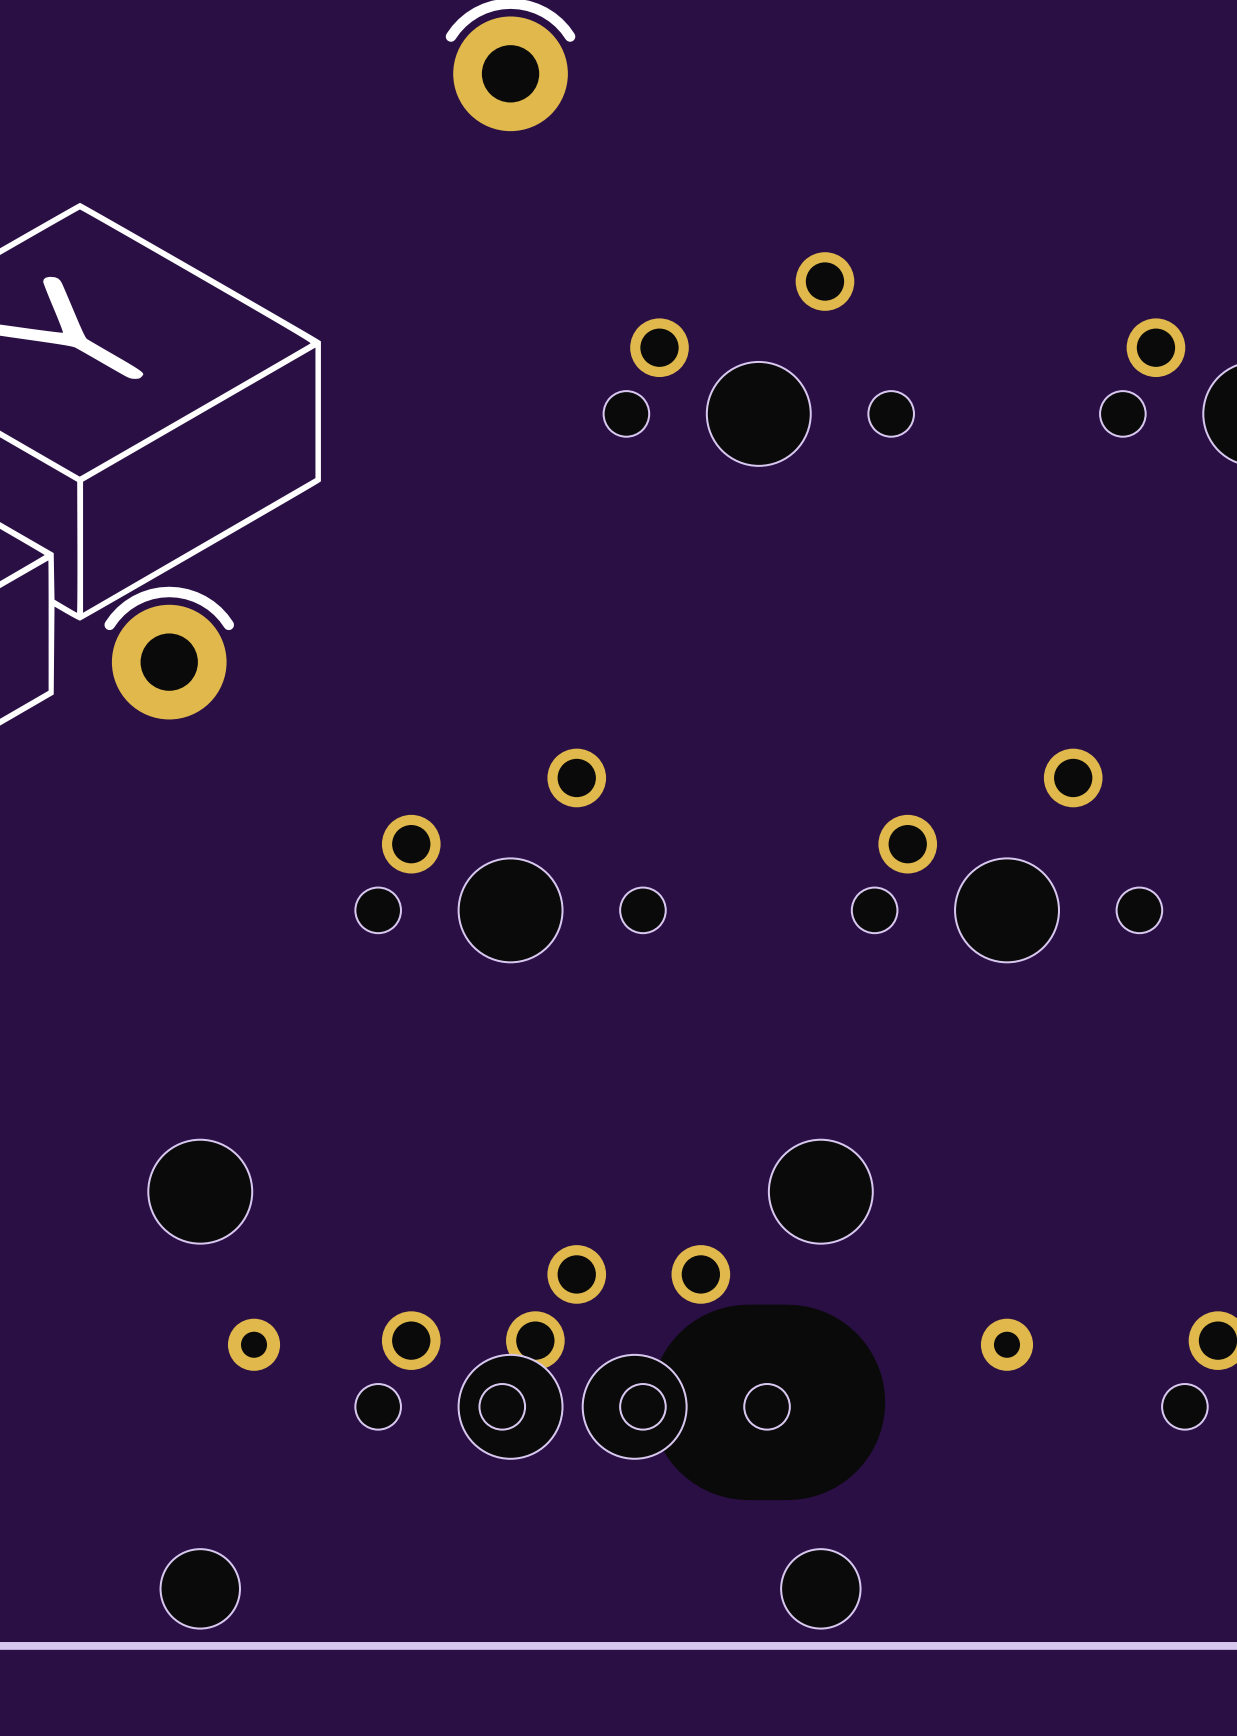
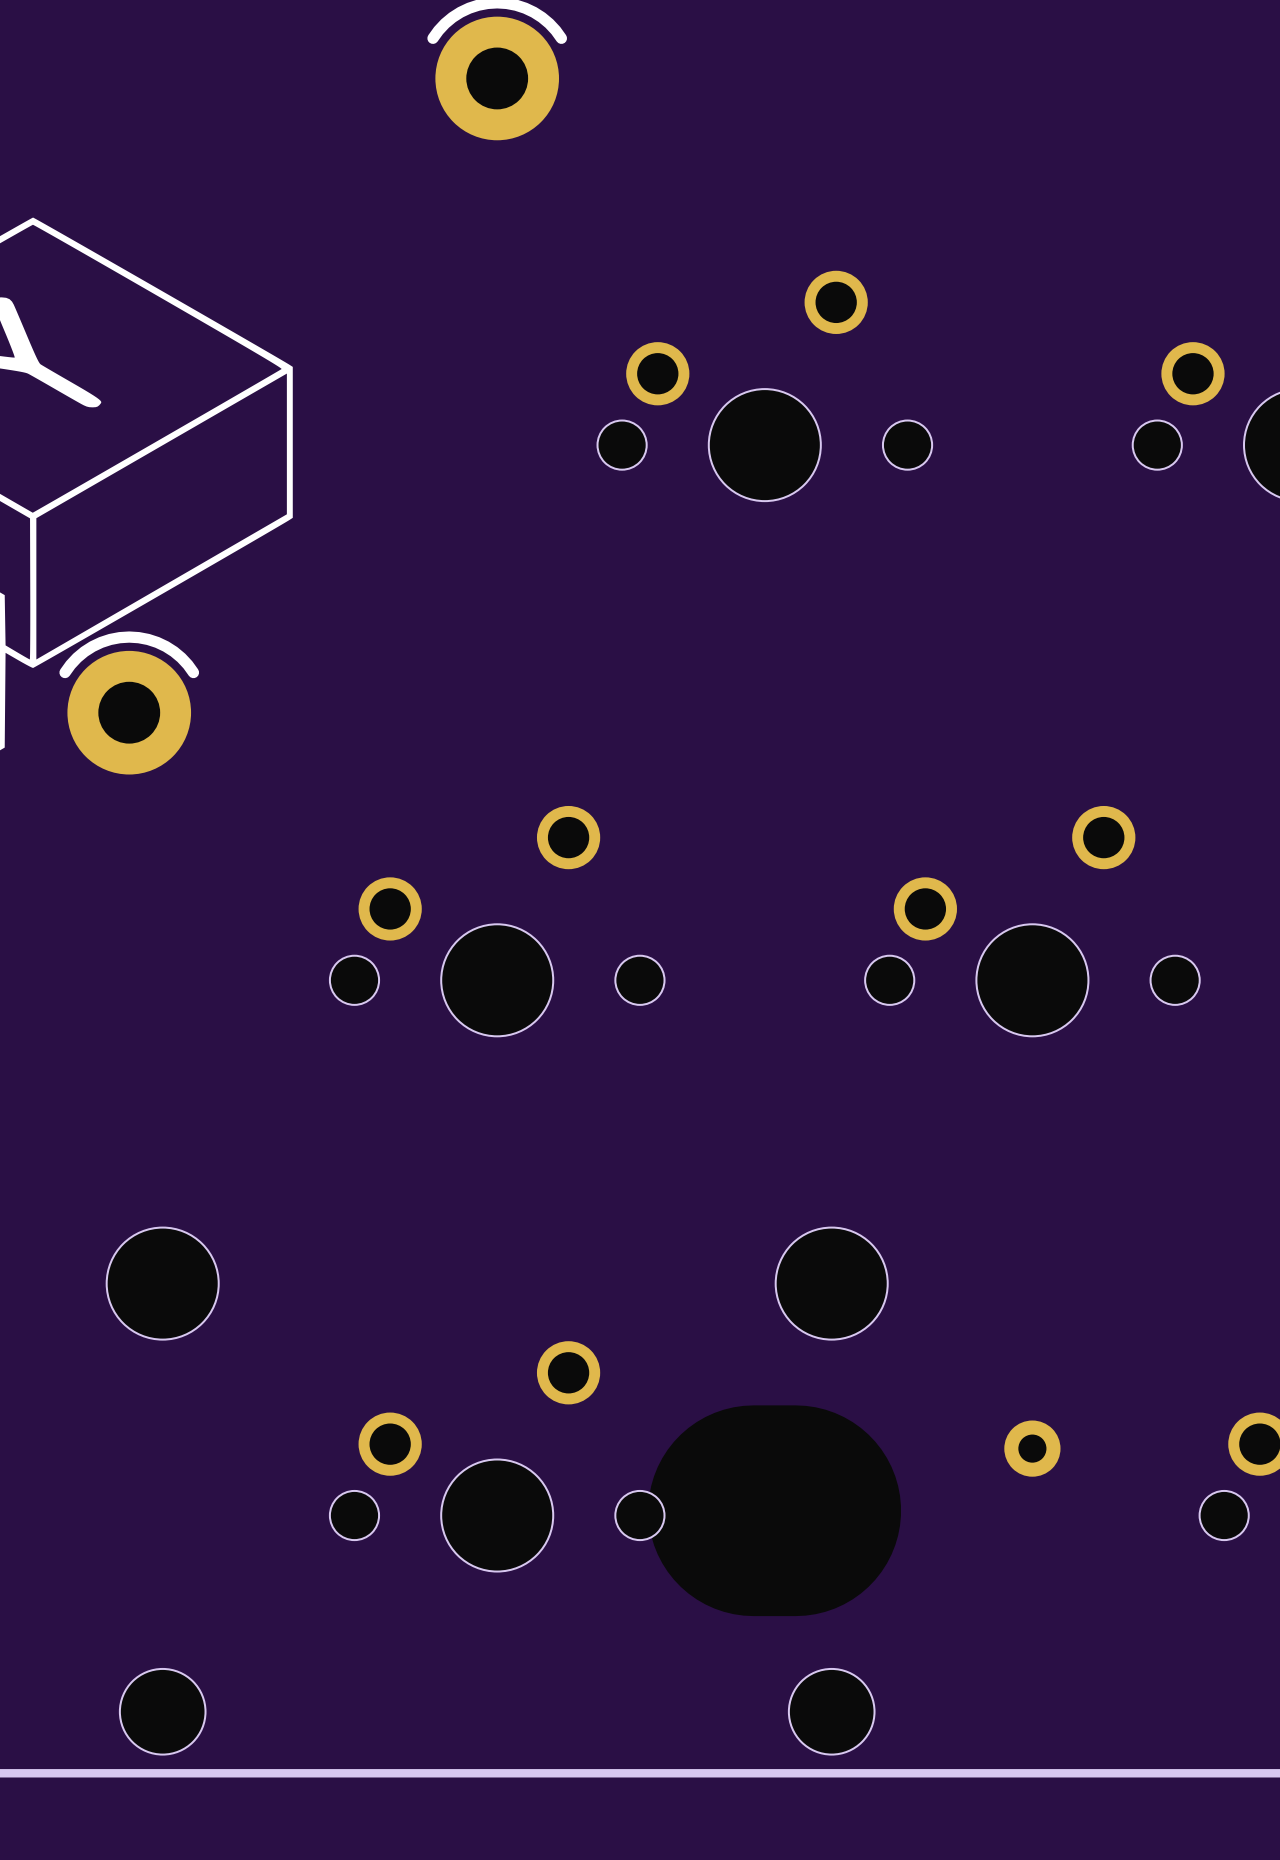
part: (254, 1344) -> none
part: (634, 1351) -> none

